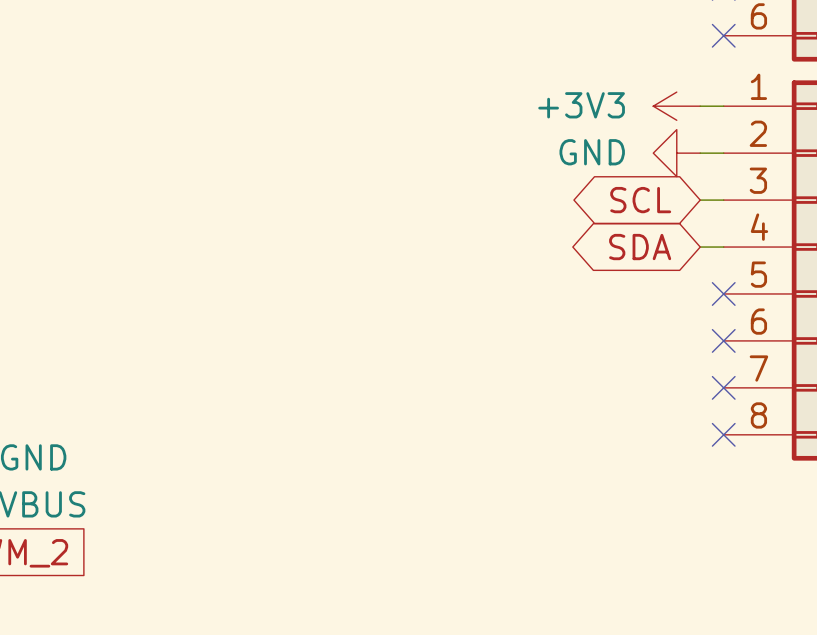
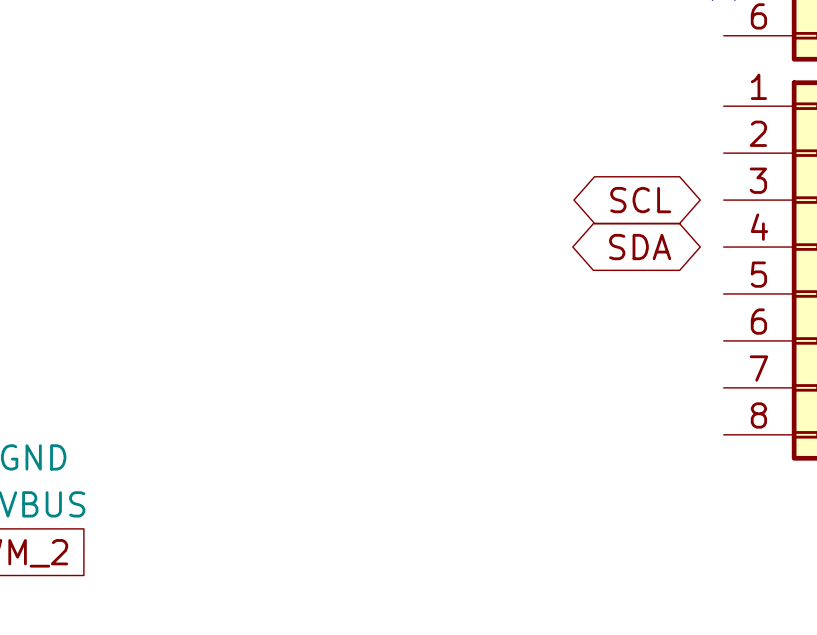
no-connect mark: (723, 35) -> none
power symbol: +3V3 (676, 106) -> none
wire: (700, 106) (723, 106) -> none
power symbol: GND (676, 153) -> none
wire: (700, 153) (723, 153) -> none
wire: (700, 200) (723, 200) -> none
wire: (700, 247) (723, 247) -> none
no-connect mark: (723, 293) -> none
no-connect mark: (723, 340) -> none
no-connect mark: (723, 387) -> none
no-connect mark: (723, 434) -> none

